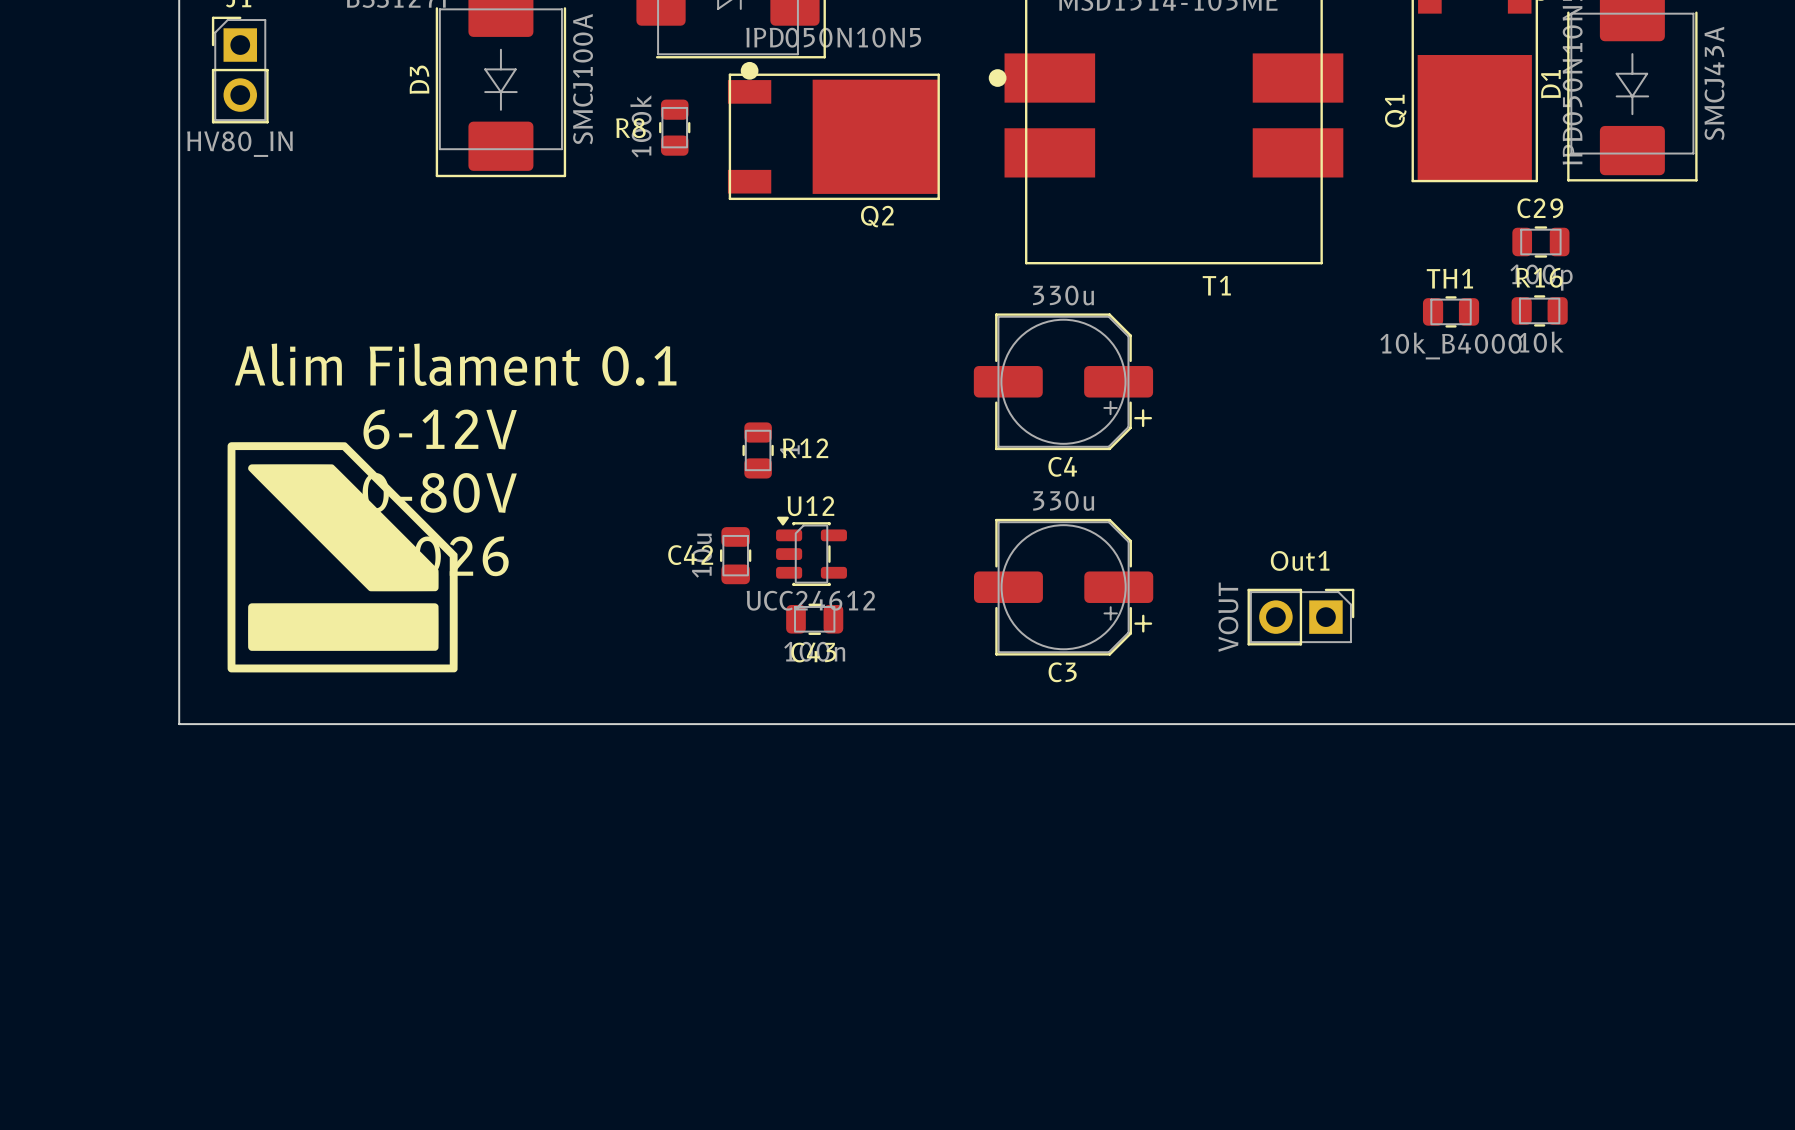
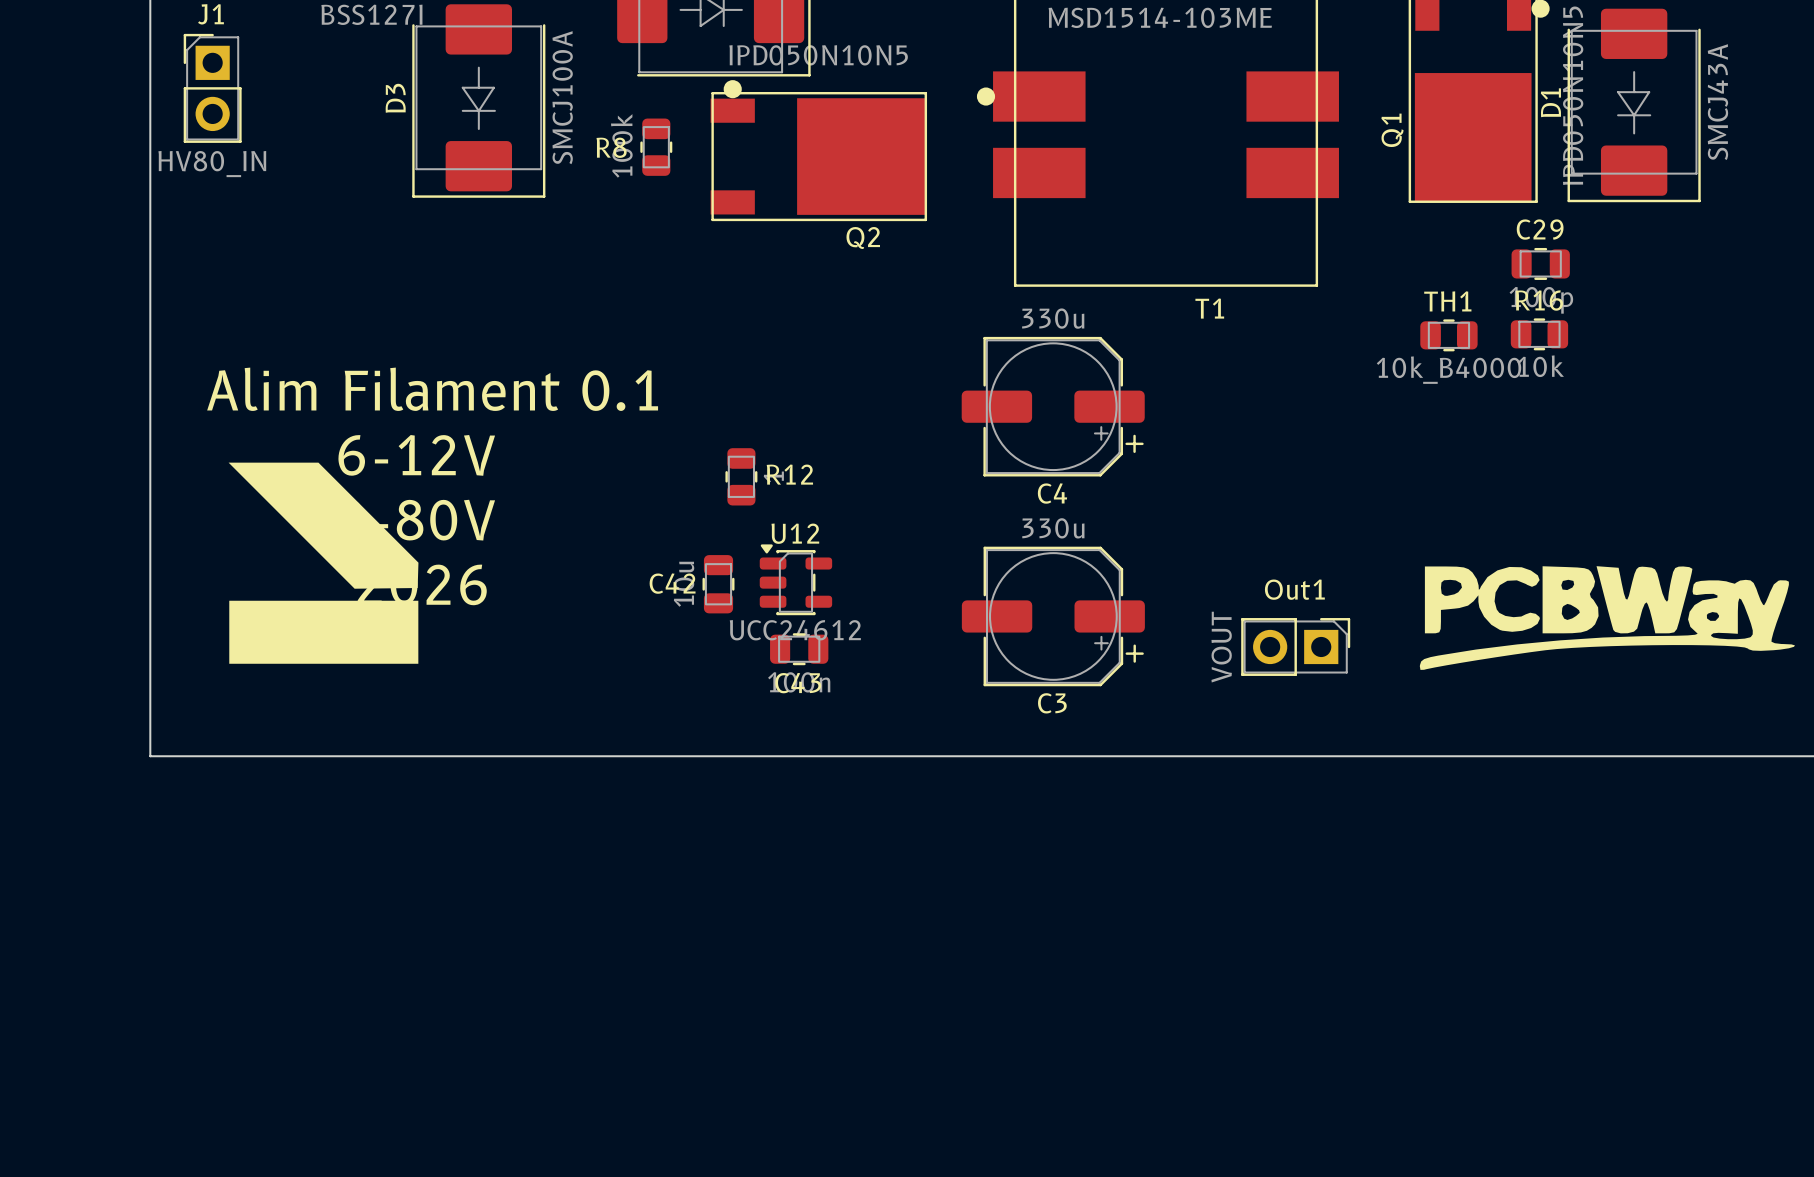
drawing: none -> [228, 462, 419, 664]
drawing: [227, 442, 458, 673] -> none
drawing: none -> [1419, 566, 1795, 670]

